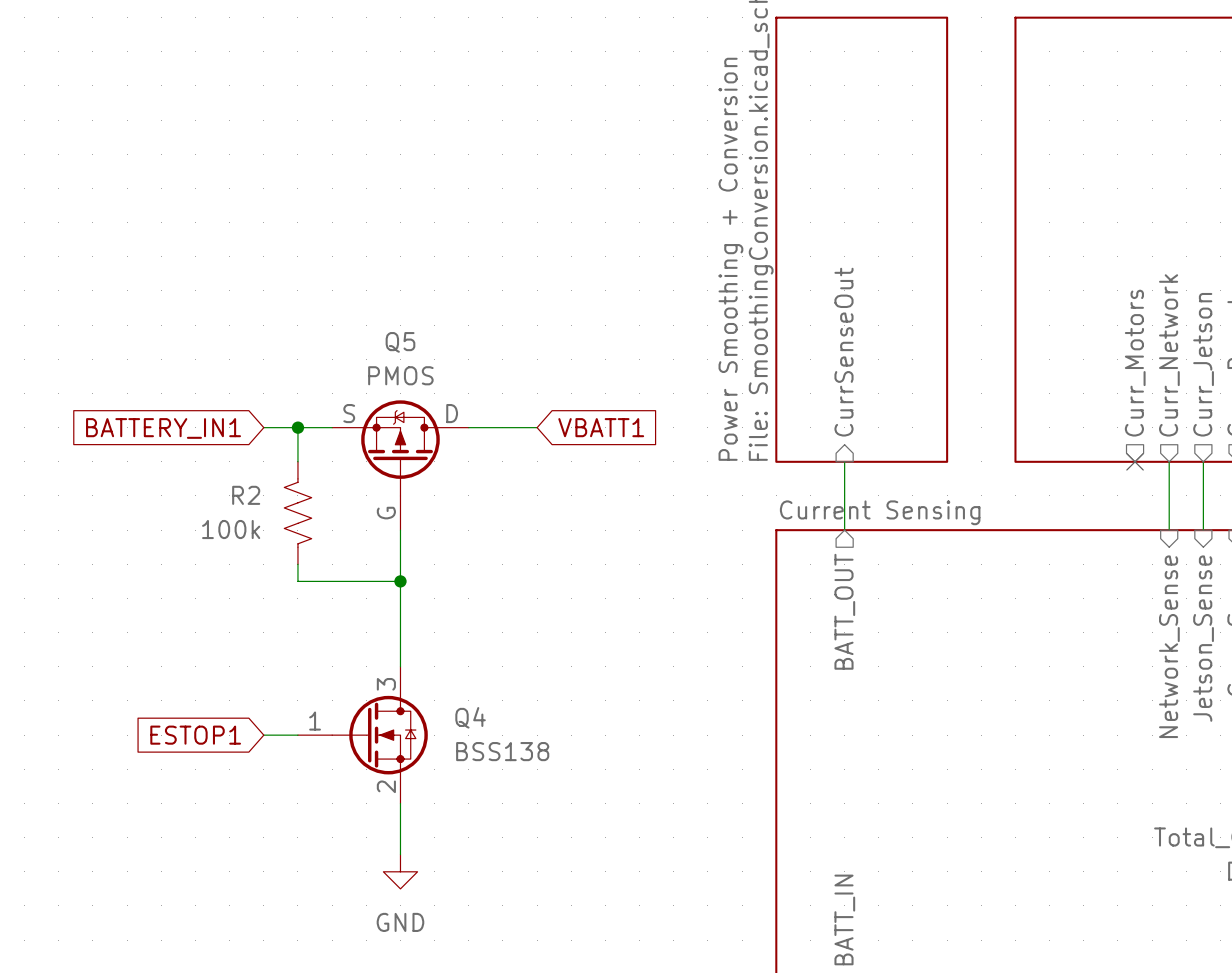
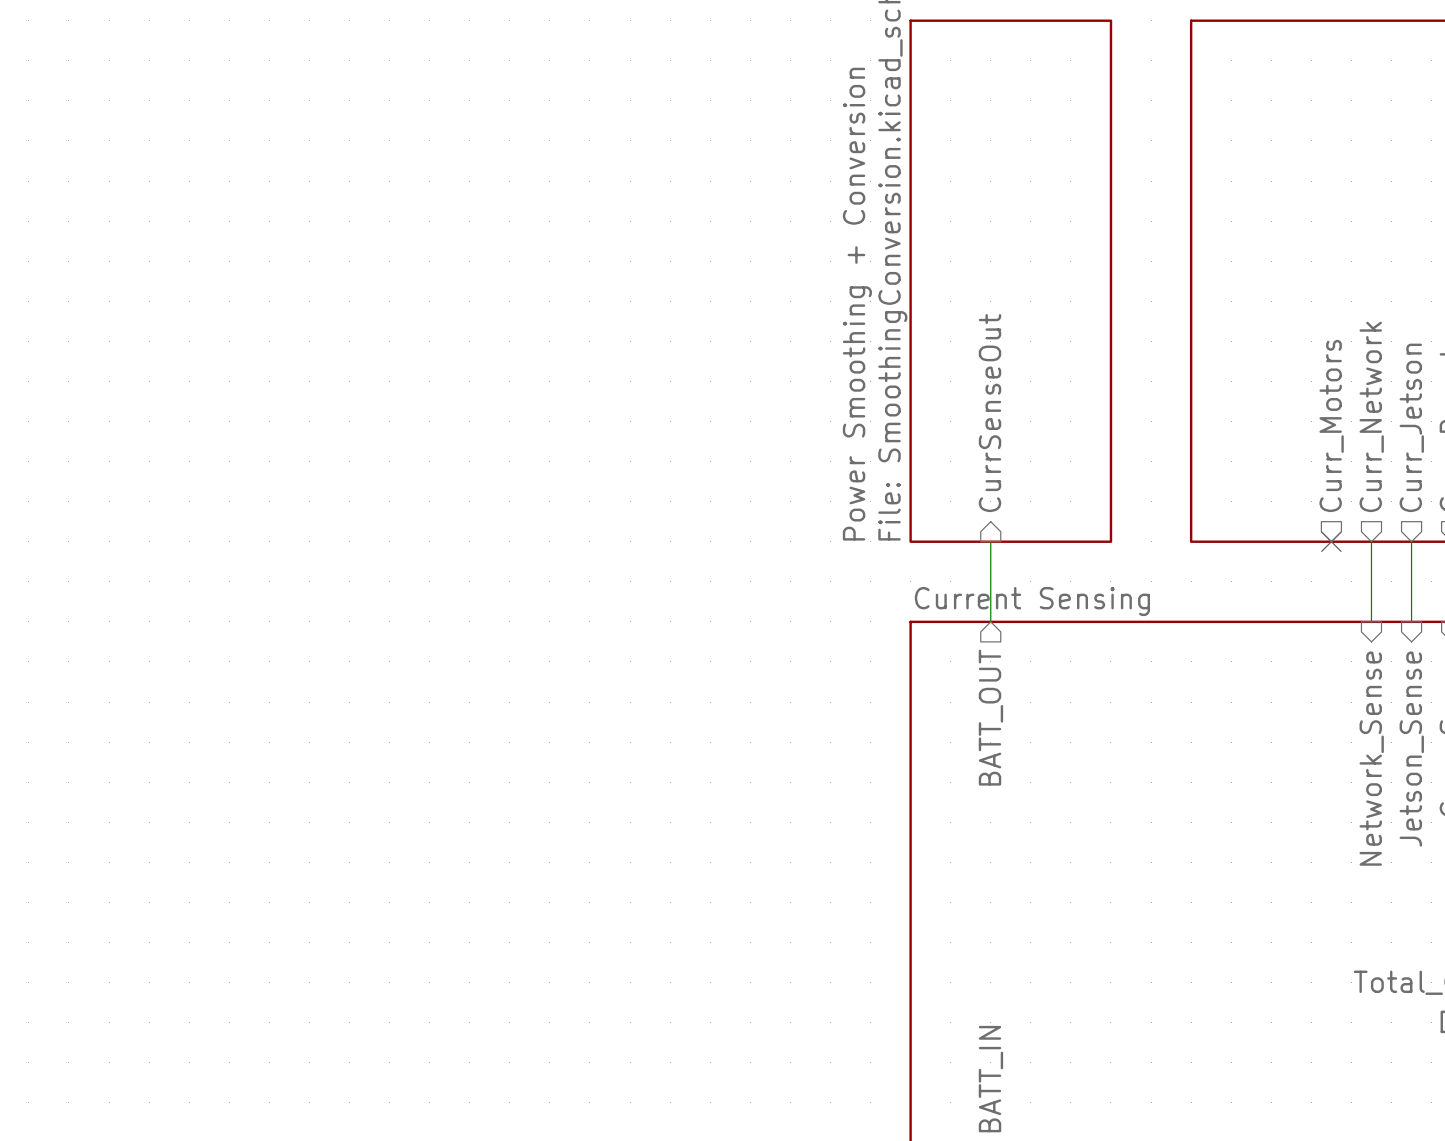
wire: (263, 427) (332, 427) -> none
wire: (297, 427) (297, 461) -> none
junction: (297, 427) -> none
wire: (468, 427) (537, 427) -> none
global label: VBATT1 (601, 427) -> none
global label: BATTERY_IN1 (163, 428) -> none
Q5: PMOS (400, 465) -> none
R2: 100k (297, 513) -> none
wire: (400, 530) (400, 666) -> none
wire: (297, 564) (297, 581) (400, 581) -> none
junction: (400, 581) -> none
global label: ESTOP1 (195, 735) -> none
wire: (263, 735) (297, 735) -> none
Q4: BSS138 (362, 735) -> none
wire: (400, 803) (400, 854) -> none
power symbol: GND (400, 871) -> none

